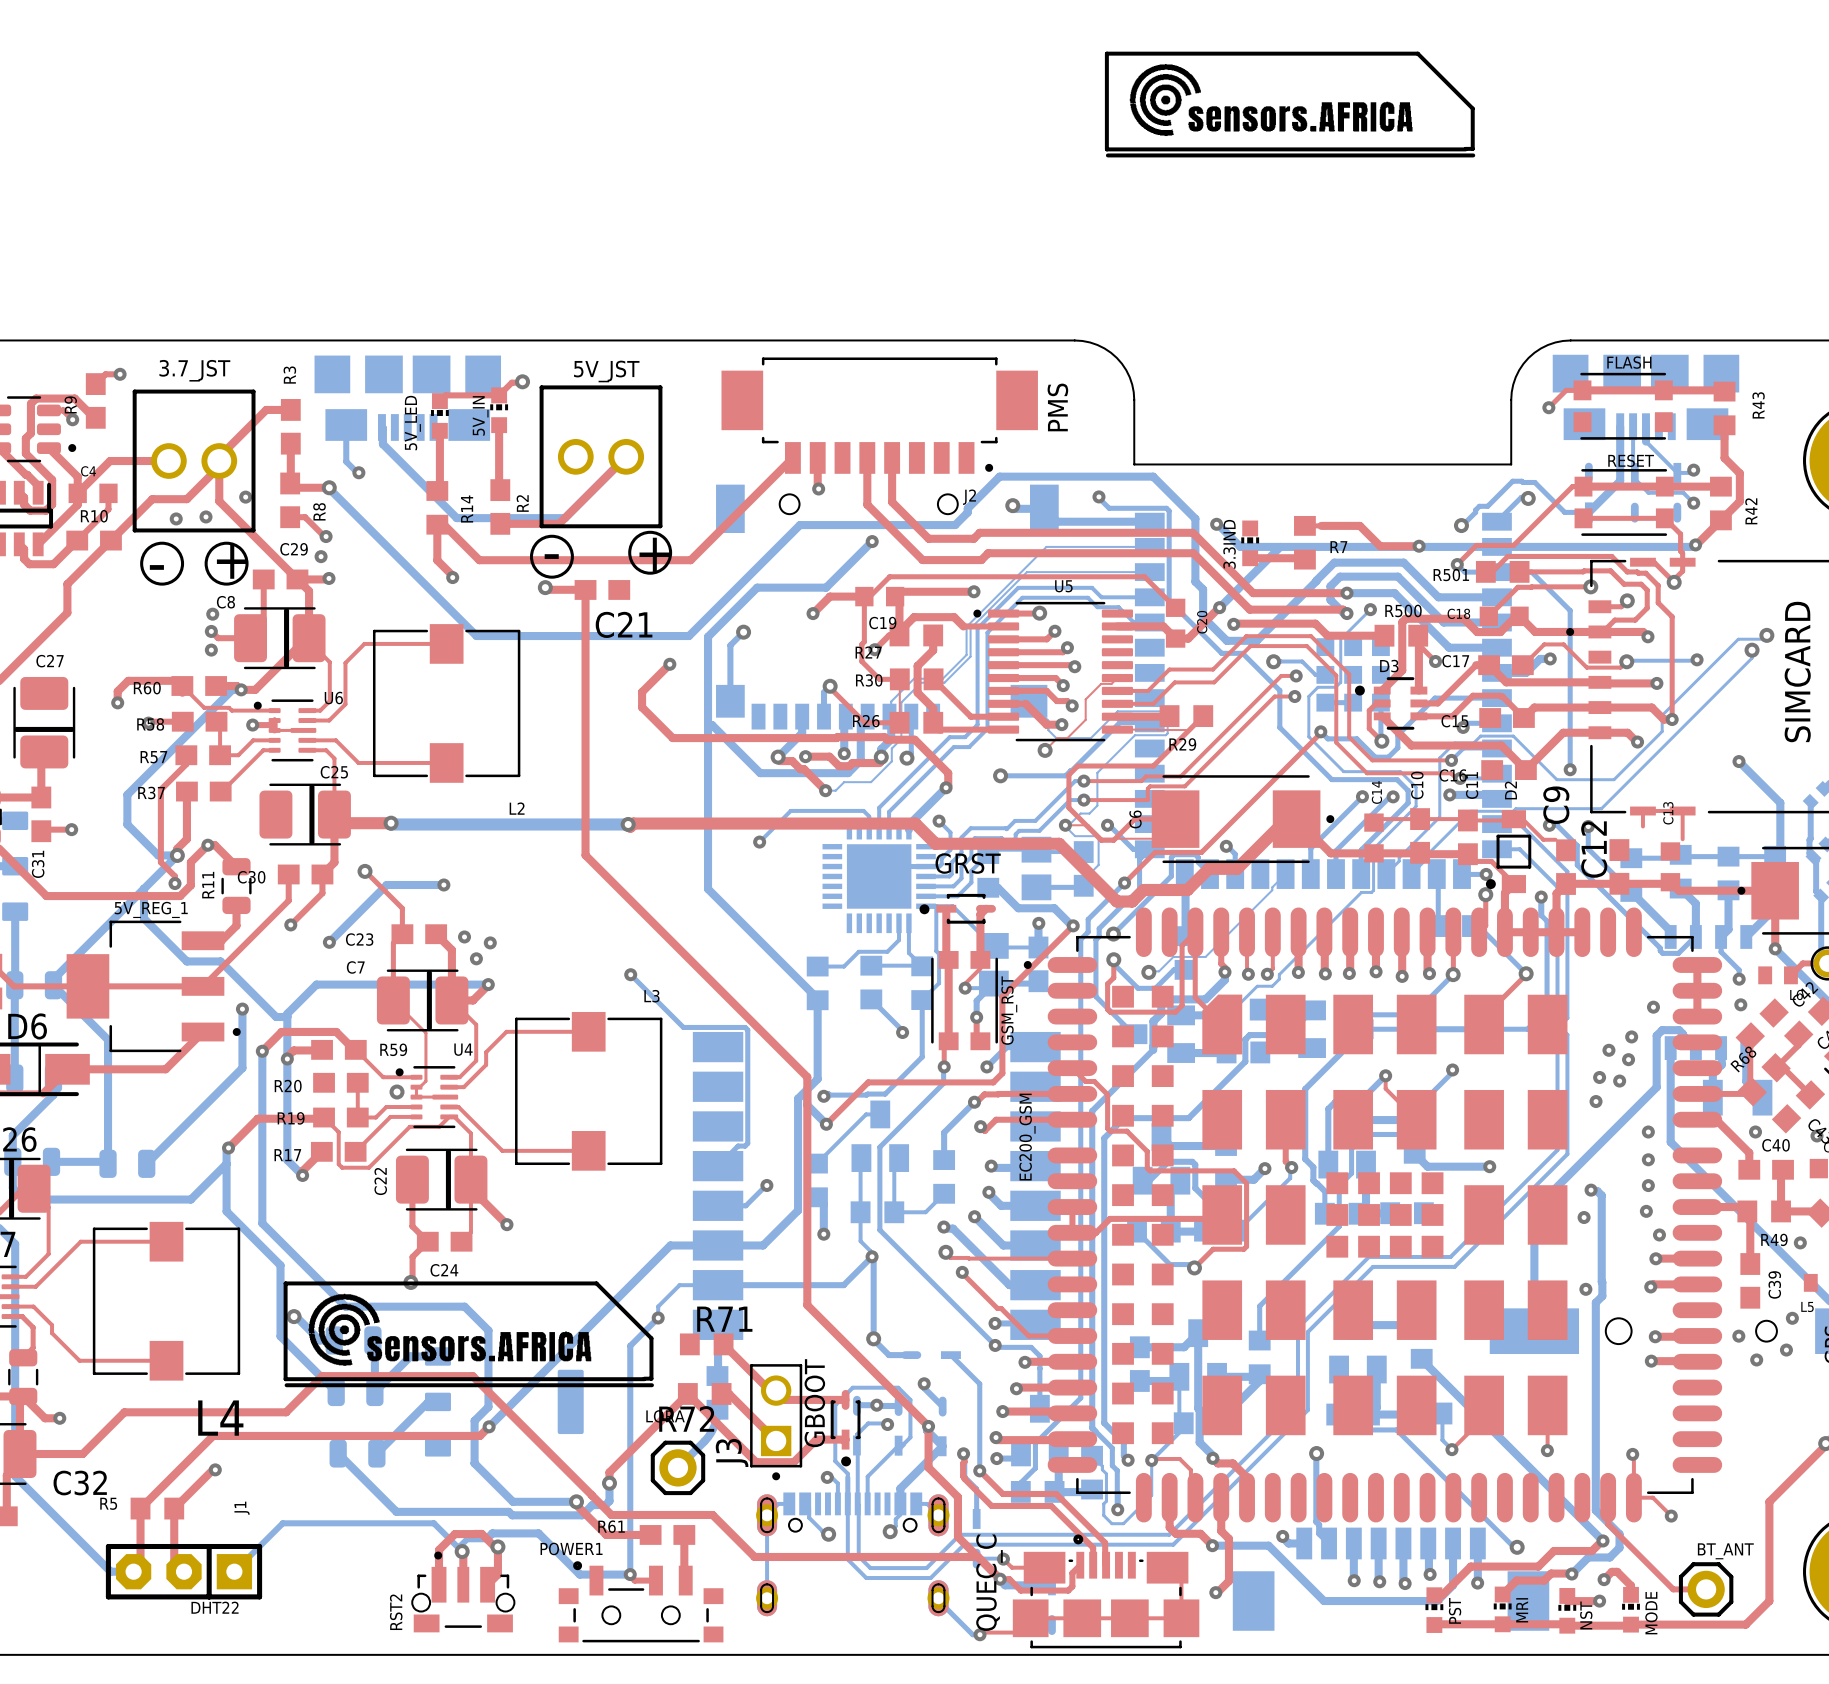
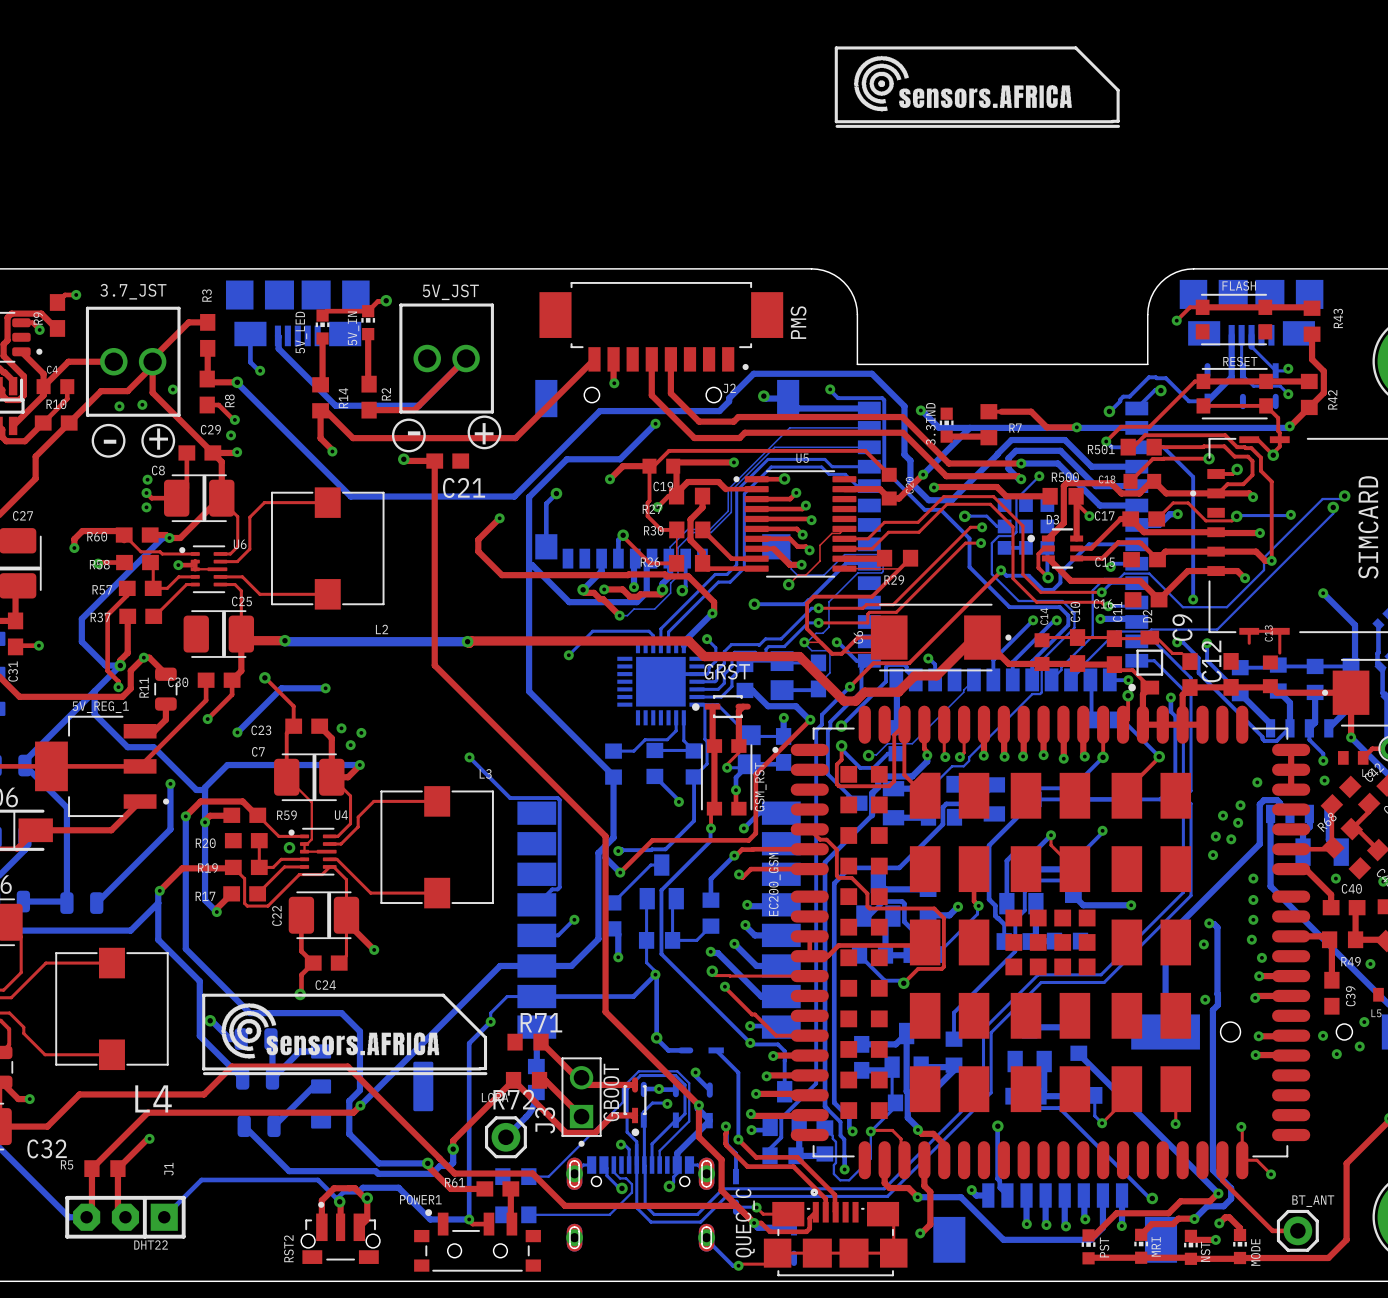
bottom track: none -> (613, 1165) (613, 1172) (620, 1178) (626, 1178) (631, 1184) (631, 1192) (609, 1214) (528, 1214)
bottom track: none -> (659, 1165) (659, 1150) (689, 1121) (689, 1083) (677, 1071) (638, 1071) (622, 1087) (622, 1102) (548, 1176) (528, 1176)
bottom track: (767, 1515) (767, 1598) -> none
part: none -> (515, 1176)
part: none -> (515, 1214)

